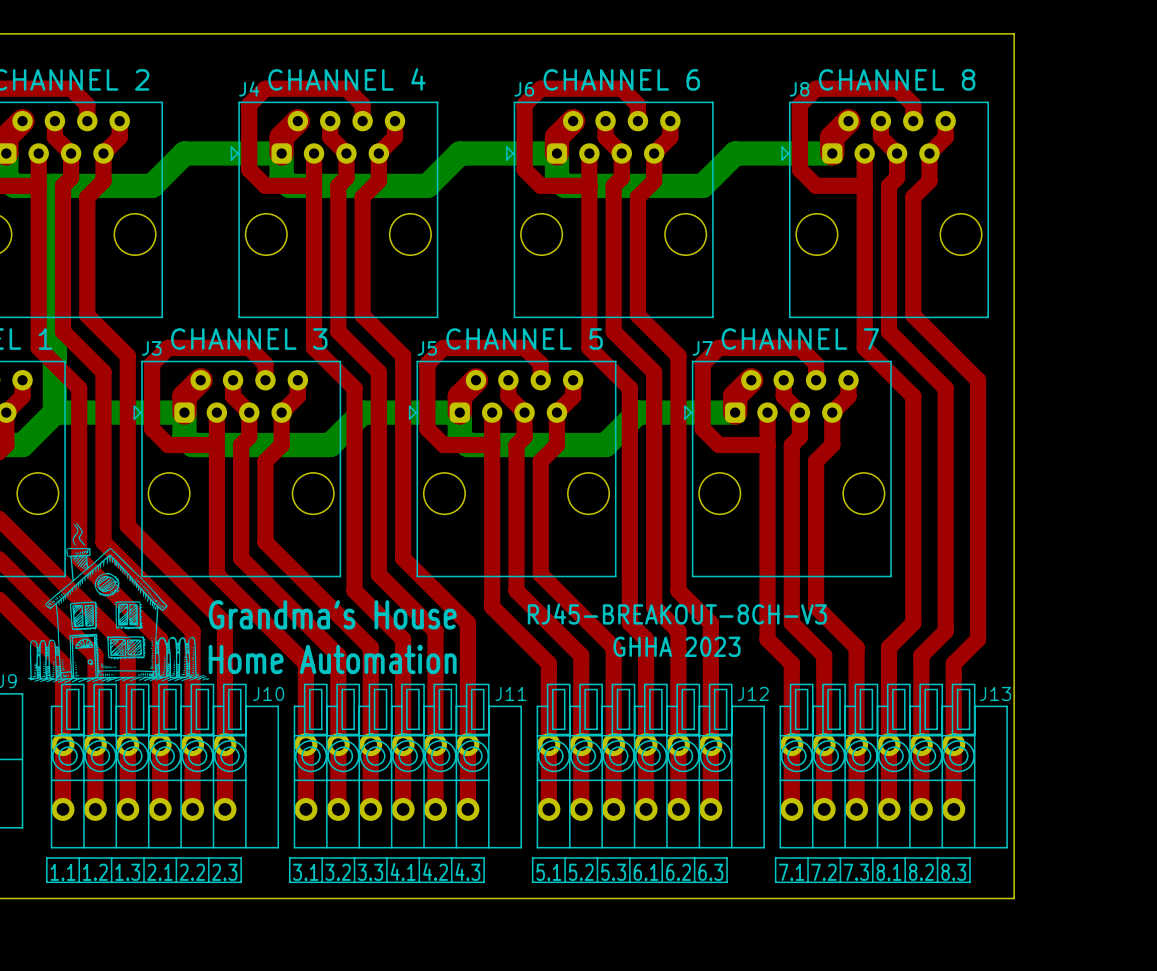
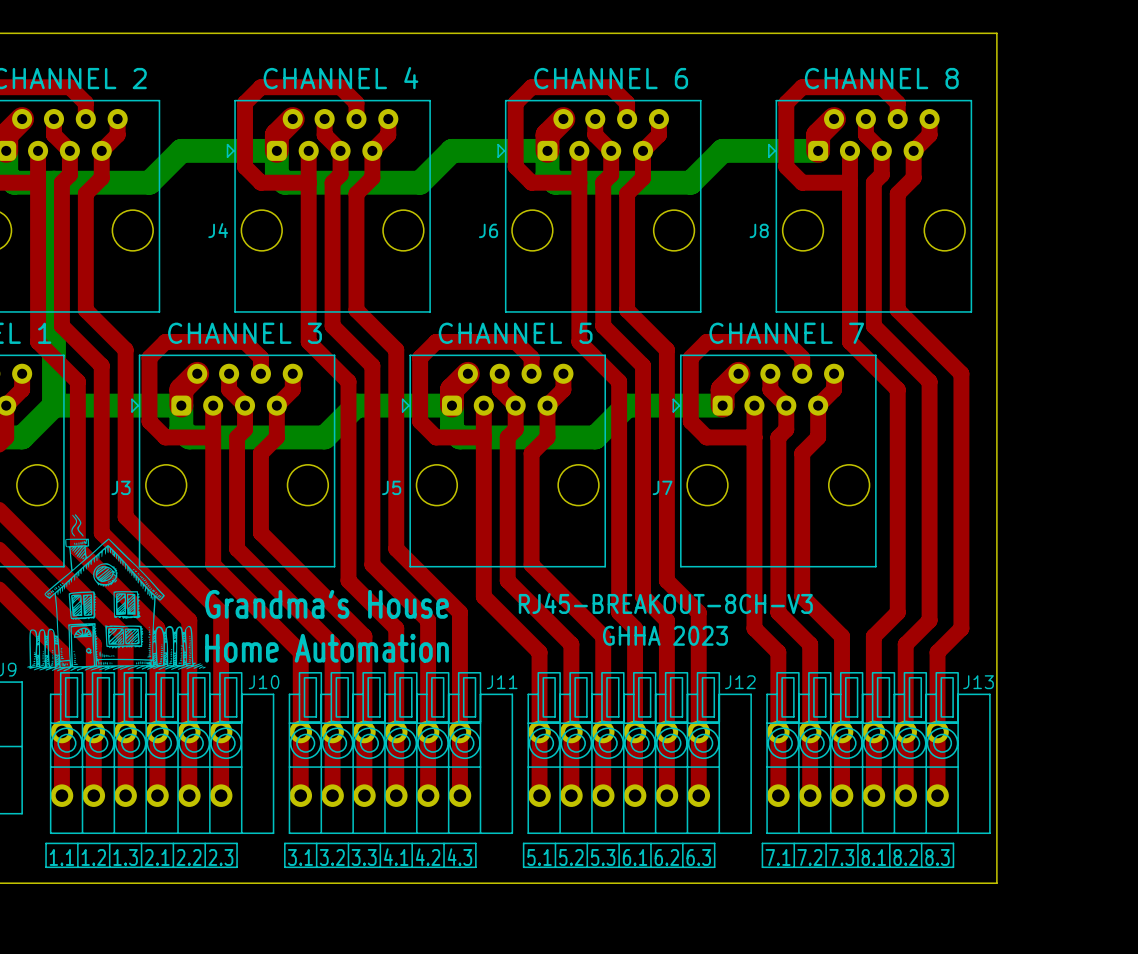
J4 name position: J4 (249, 88) -> J4 (218, 230)
J6 name position: J6 (524, 89) -> J6 (488, 230)
J8 name position: J8 (799, 89) -> J8 (759, 230)
J3 name position: J3 (151, 348) -> J3 (121, 487)
J5 name position: J5 (427, 348) -> J5 (391, 487)
J7 name position: J7 (702, 348) -> J7 (662, 487)

